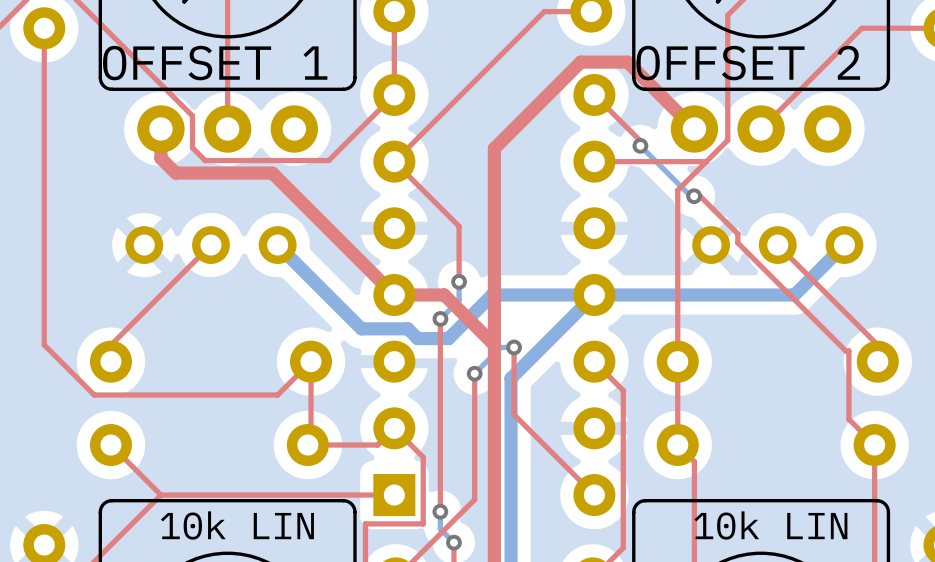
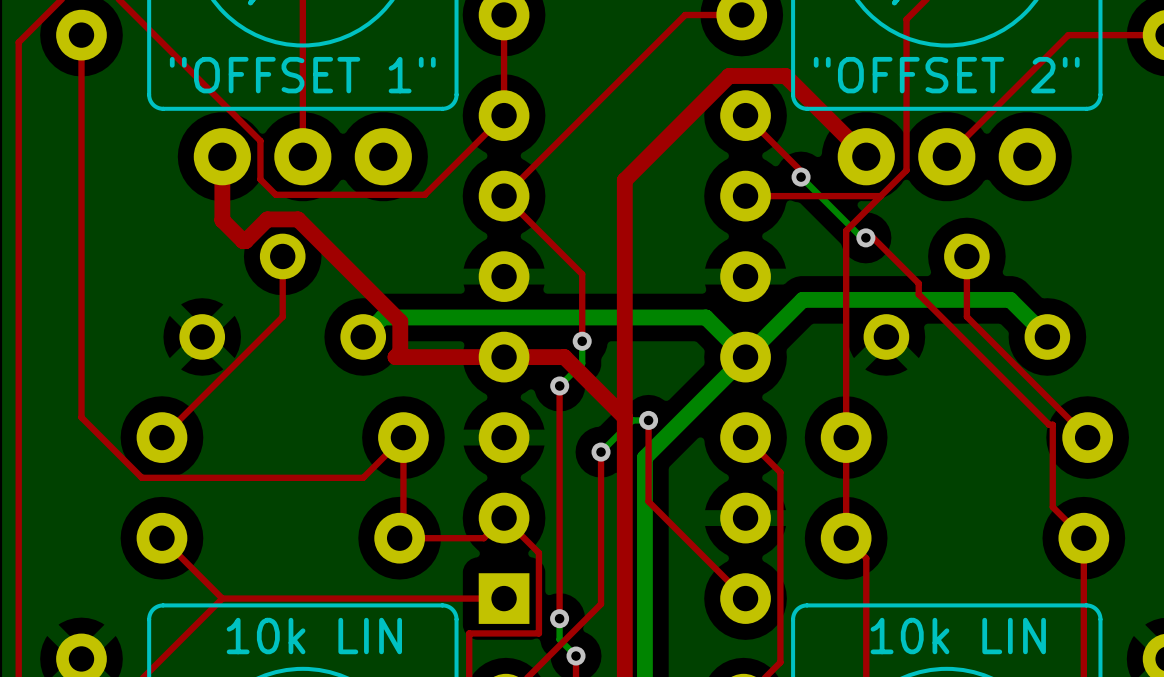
text: none -> "OFFSET 1" (302, 75)
text: none -> "OFFSET 2" (946, 75)
part text: OFFSET 1 (215, 63) -> none
part text: OFFSET 2 (748, 63) -> none
top track: (160, 158) (175, 173) (272, 173) (394, 294) -> (222, 192) (222, 220) (243, 241) (245, 241) (267, 219) (298, 219) (400, 321) (400, 352) (395, 357) (504, 357)
part footprint: [125, 226, 297, 264] -> [179, 233, 387, 360]
part footprint: [692, 226, 864, 264] -> [863, 233, 1071, 360]
top track: (210, 245) (110, 345) (110, 361) -> (282, 256) (282, 316) (161, 437)
bottom track: (277, 245) (361, 328) (407, 328) (417, 338) (448, 338) (492, 294) (794, 294) (844, 245) -> none
top track: (777, 245) (877, 345) (877, 361) -> (966, 256) (966, 316) (1087, 437)
bottom track: none -> (363, 336) (382, 317) (705, 317) (745, 357) (802, 299) (1010, 299) (1047, 336)

